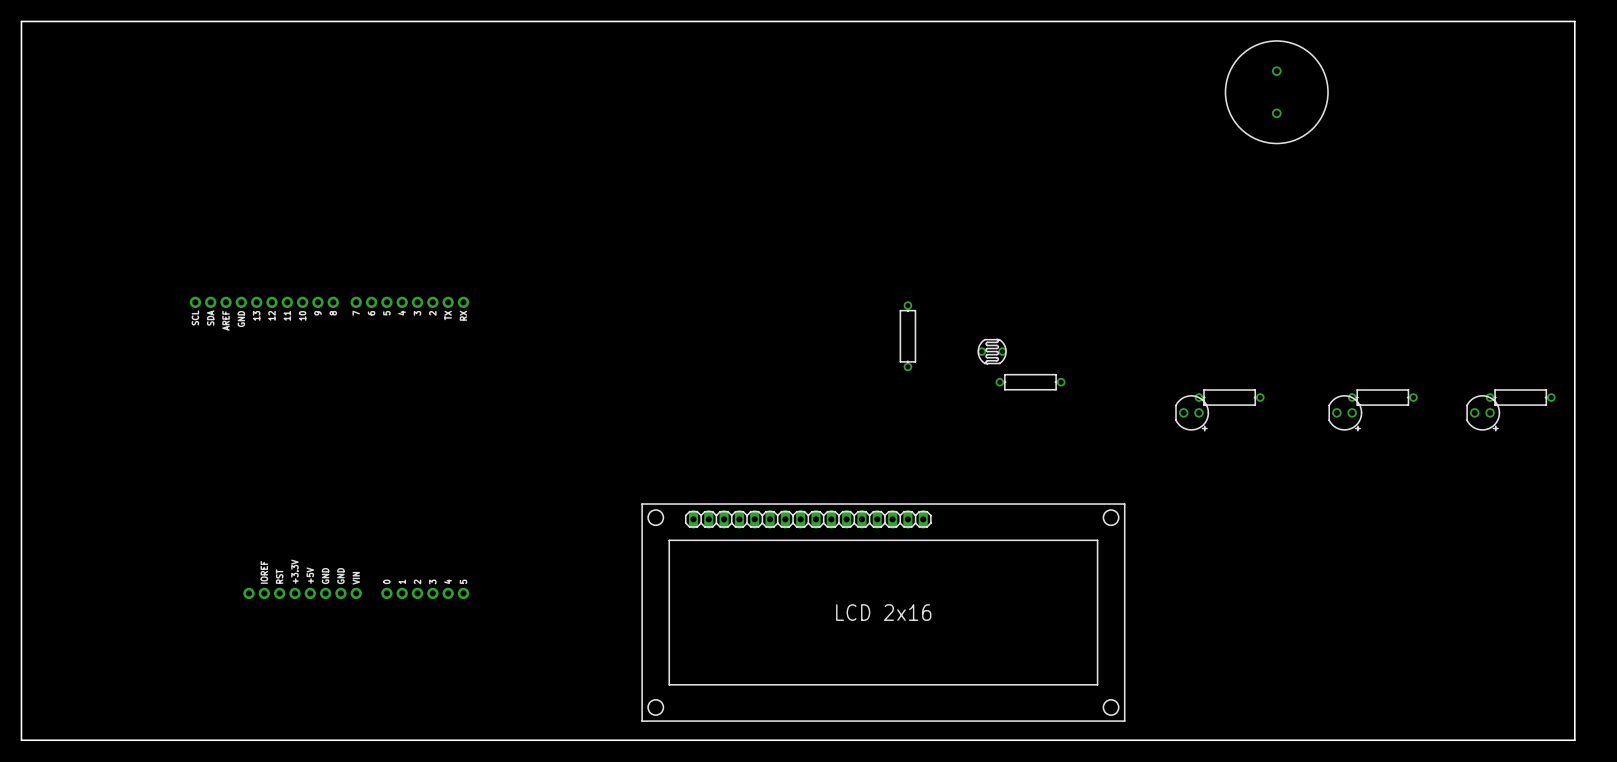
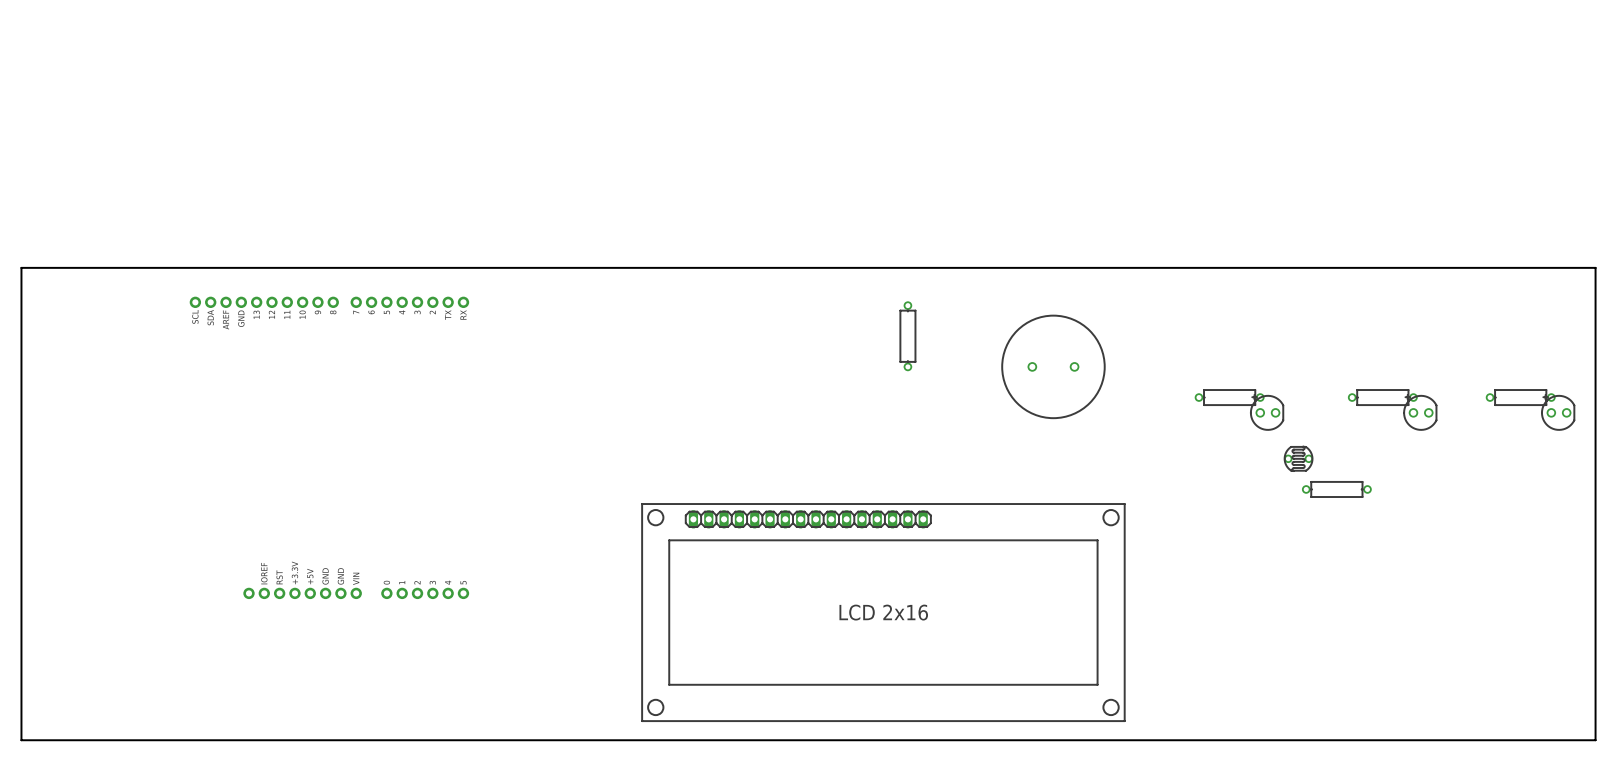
part: (1276, 92) -> none
board edge: (21, 267) (21, 21) (1574, 21) (1574, 740) -> (21, 267) (1595, 267) (1595, 740) (1574, 740)
part: (992, 351) -> none
part: none -> (1053, 366)
part: (1030, 382) -> none
part: none -> (1267, 412)
part: none -> (1420, 412)
part: none -> (1558, 412)
part: (1192, 413) -> none
part: (1345, 413) -> none
part: (1483, 413) -> none
part: none -> (1298, 458)
part: none -> (1336, 489)

